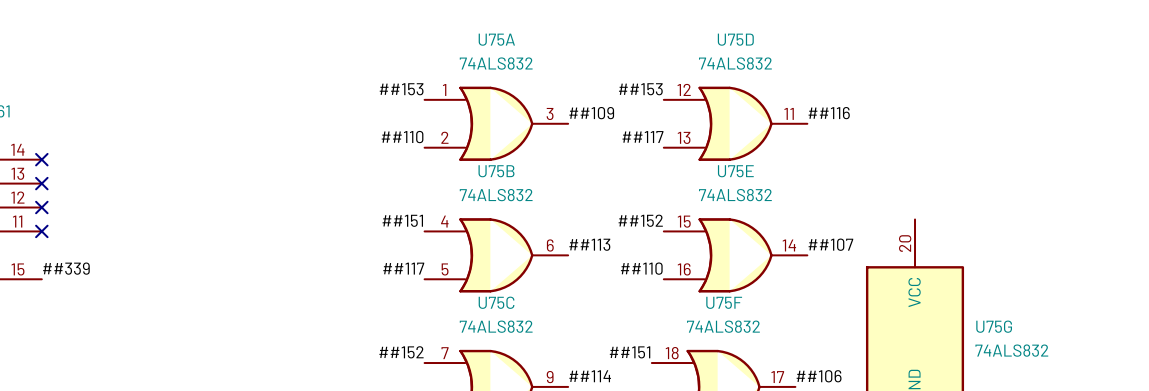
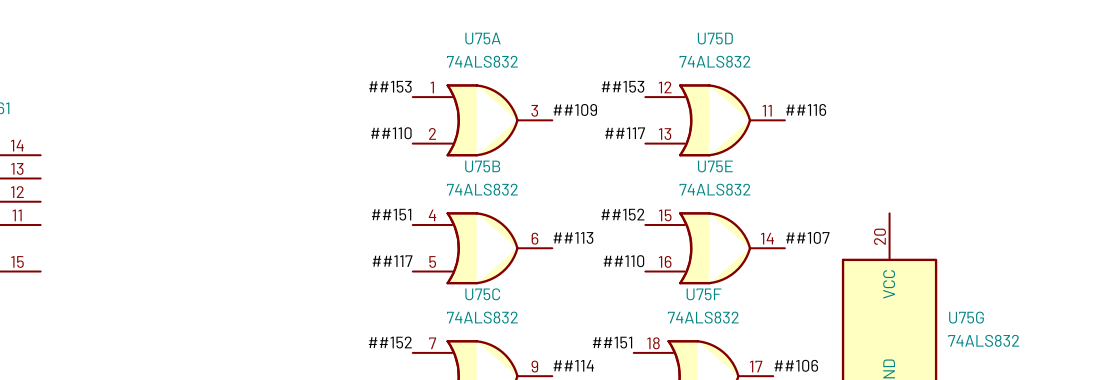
no-connect mark: (41, 159) -> none
no-connect mark: (41, 183) -> none
no-connect mark: (41, 207) -> none
no-connect mark: (41, 231) -> none
label: ##339 (66, 268) -> none

